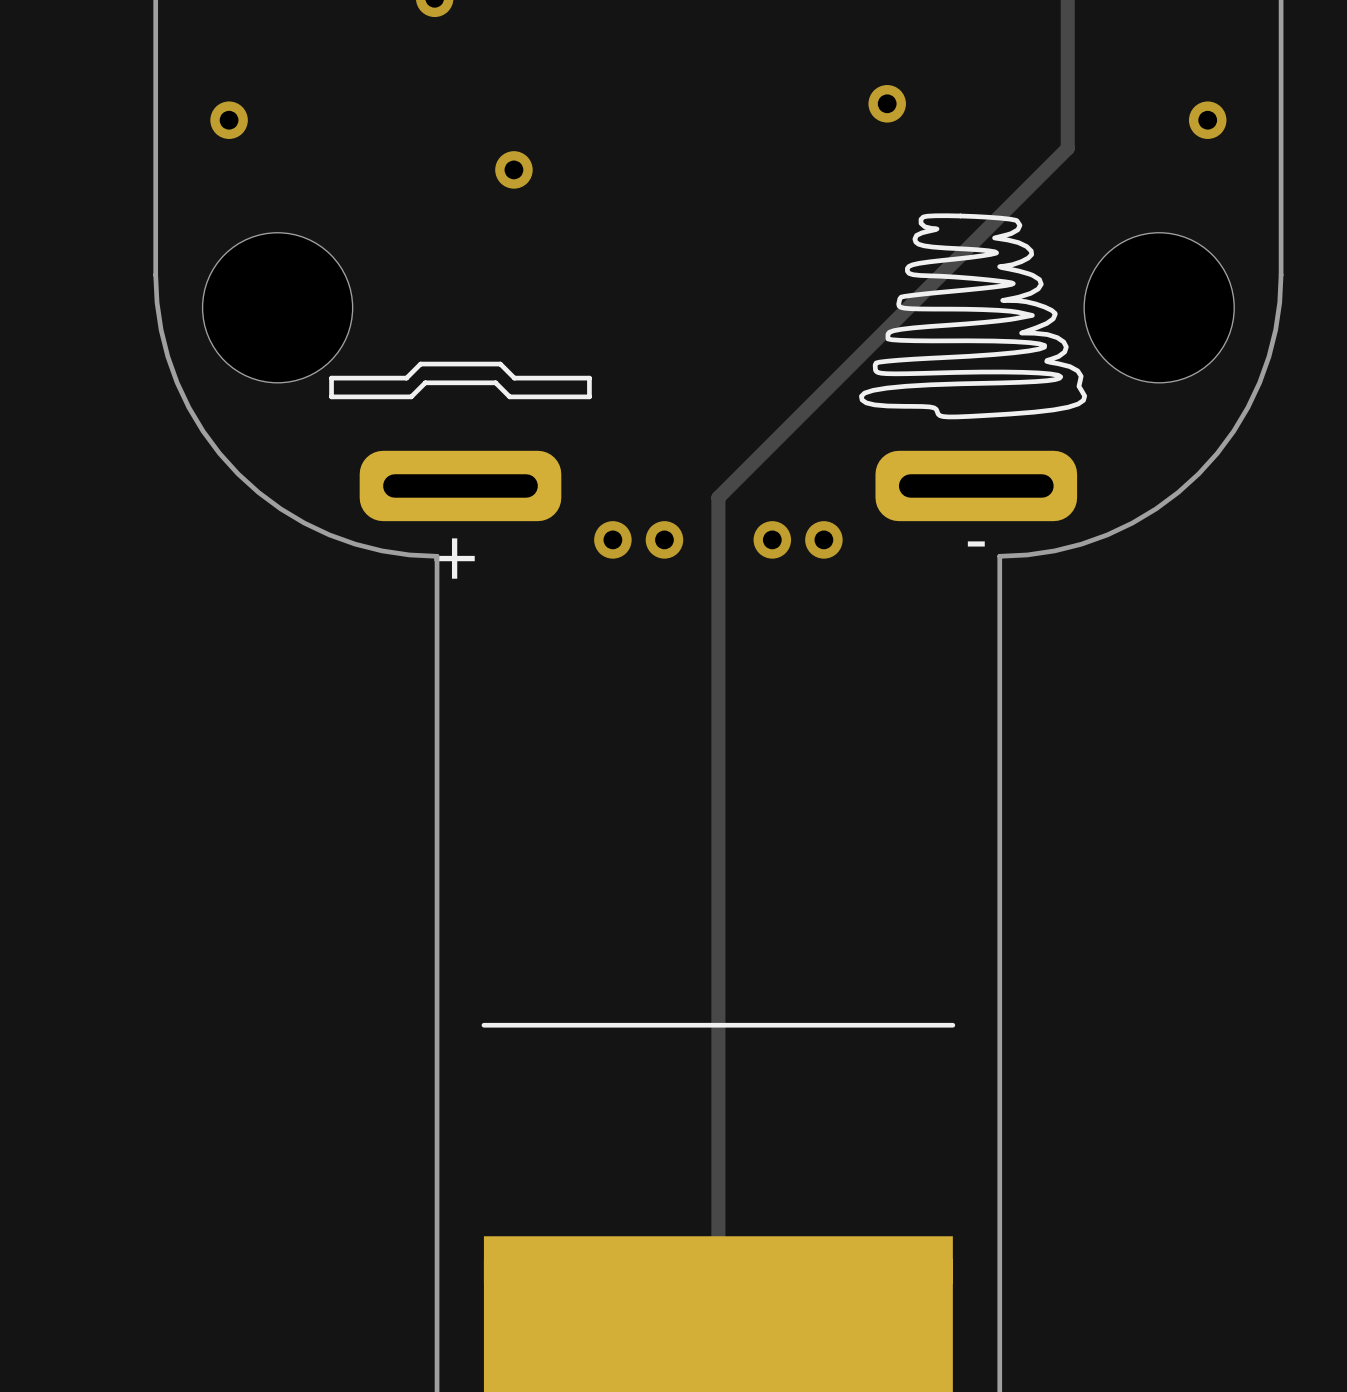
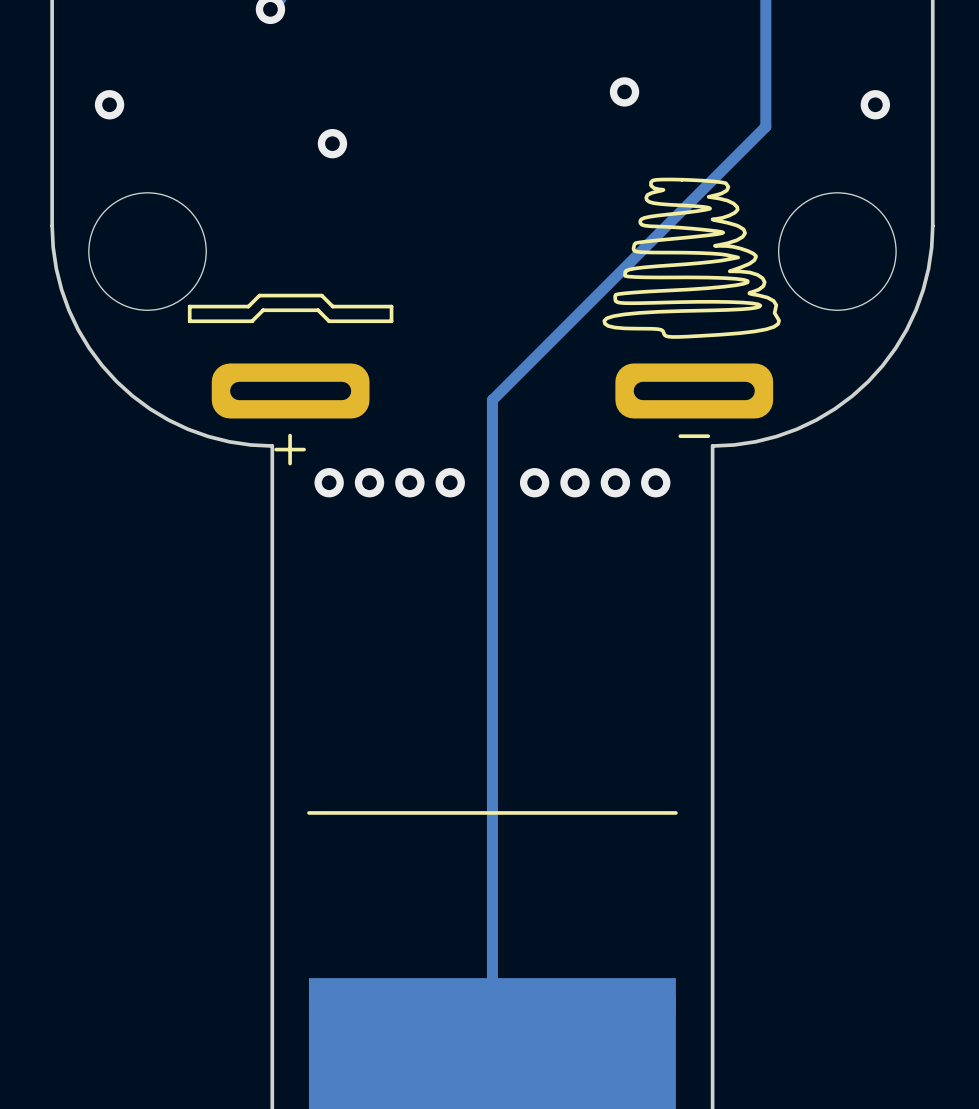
via: (612, 539) -> none
via: (664, 539) -> none
via: (772, 539) -> none
via: (823, 539) -> none
via: none -> (329, 482)
via: none -> (369, 482)
via: none -> (409, 482)
via: none -> (450, 482)
via: none -> (534, 482)
via: none -> (575, 482)
via: none -> (615, 482)
via: none -> (655, 482)

